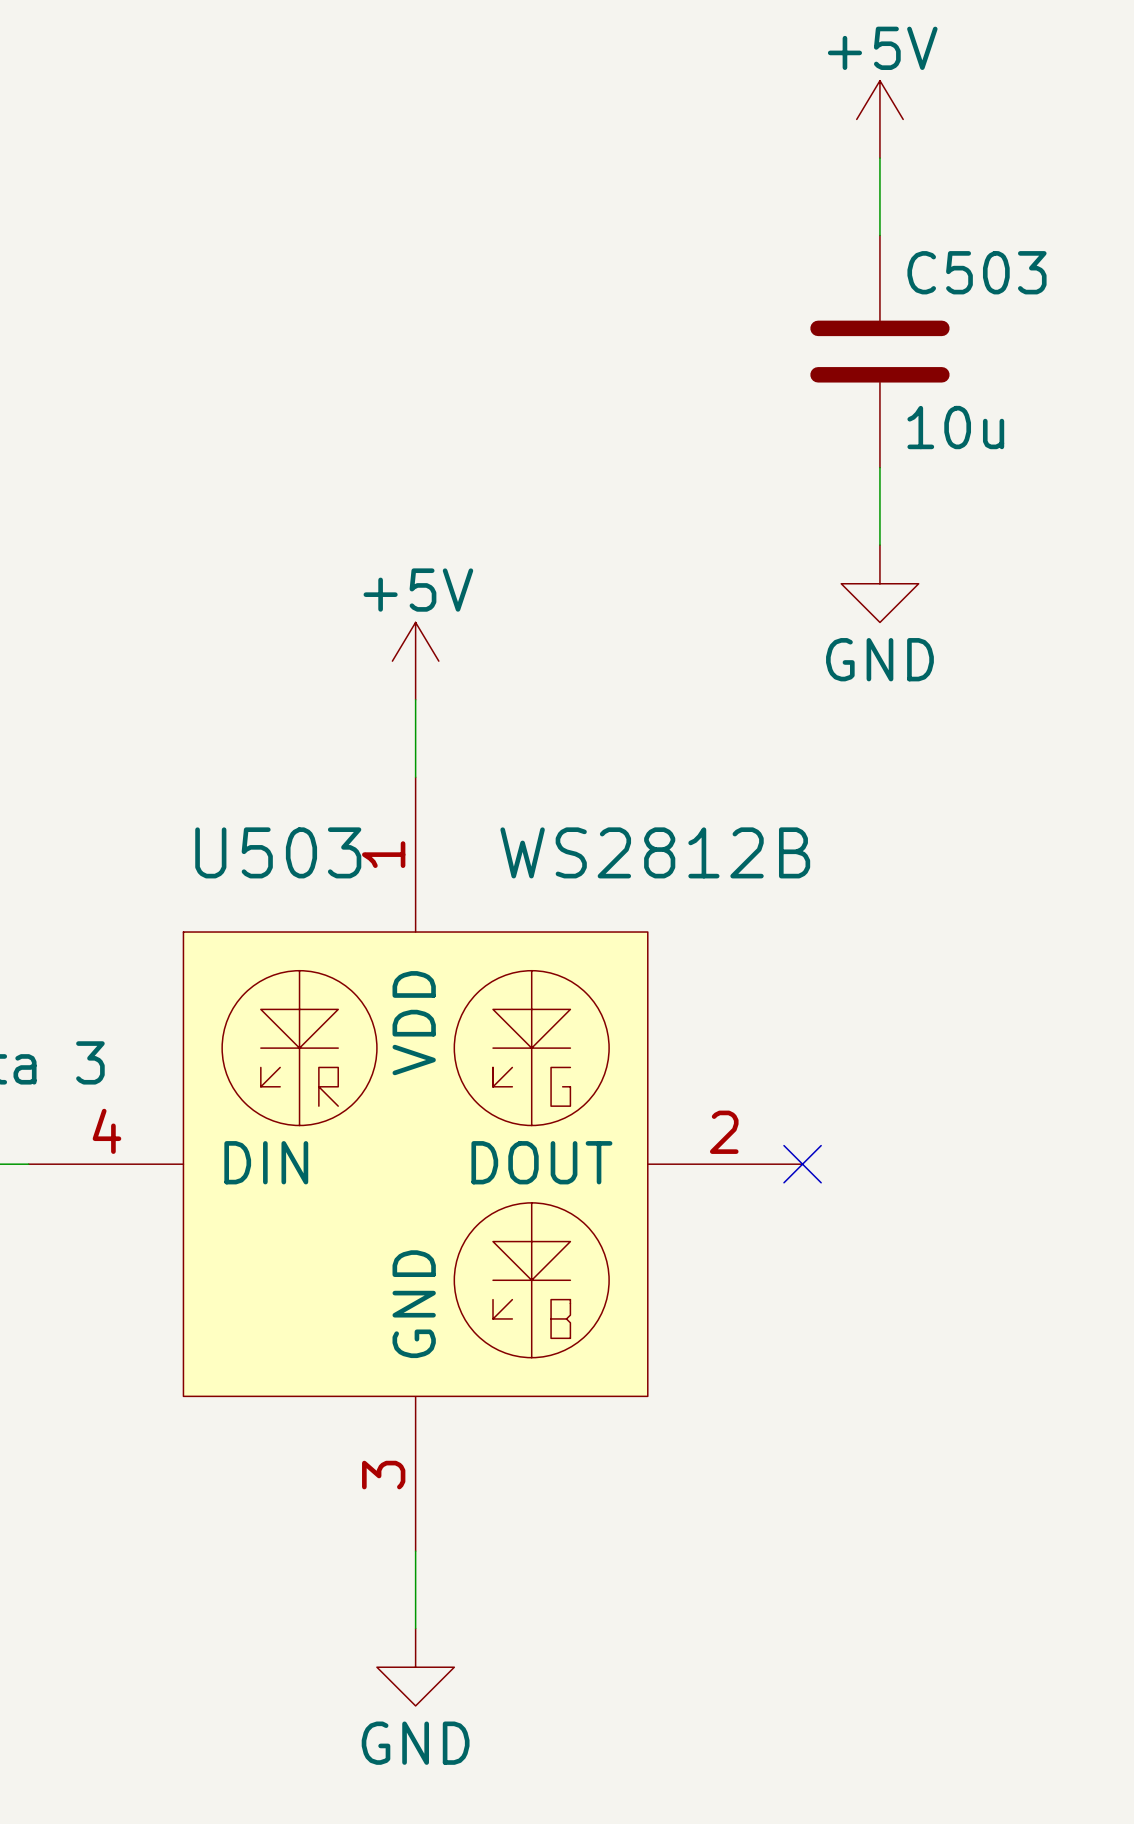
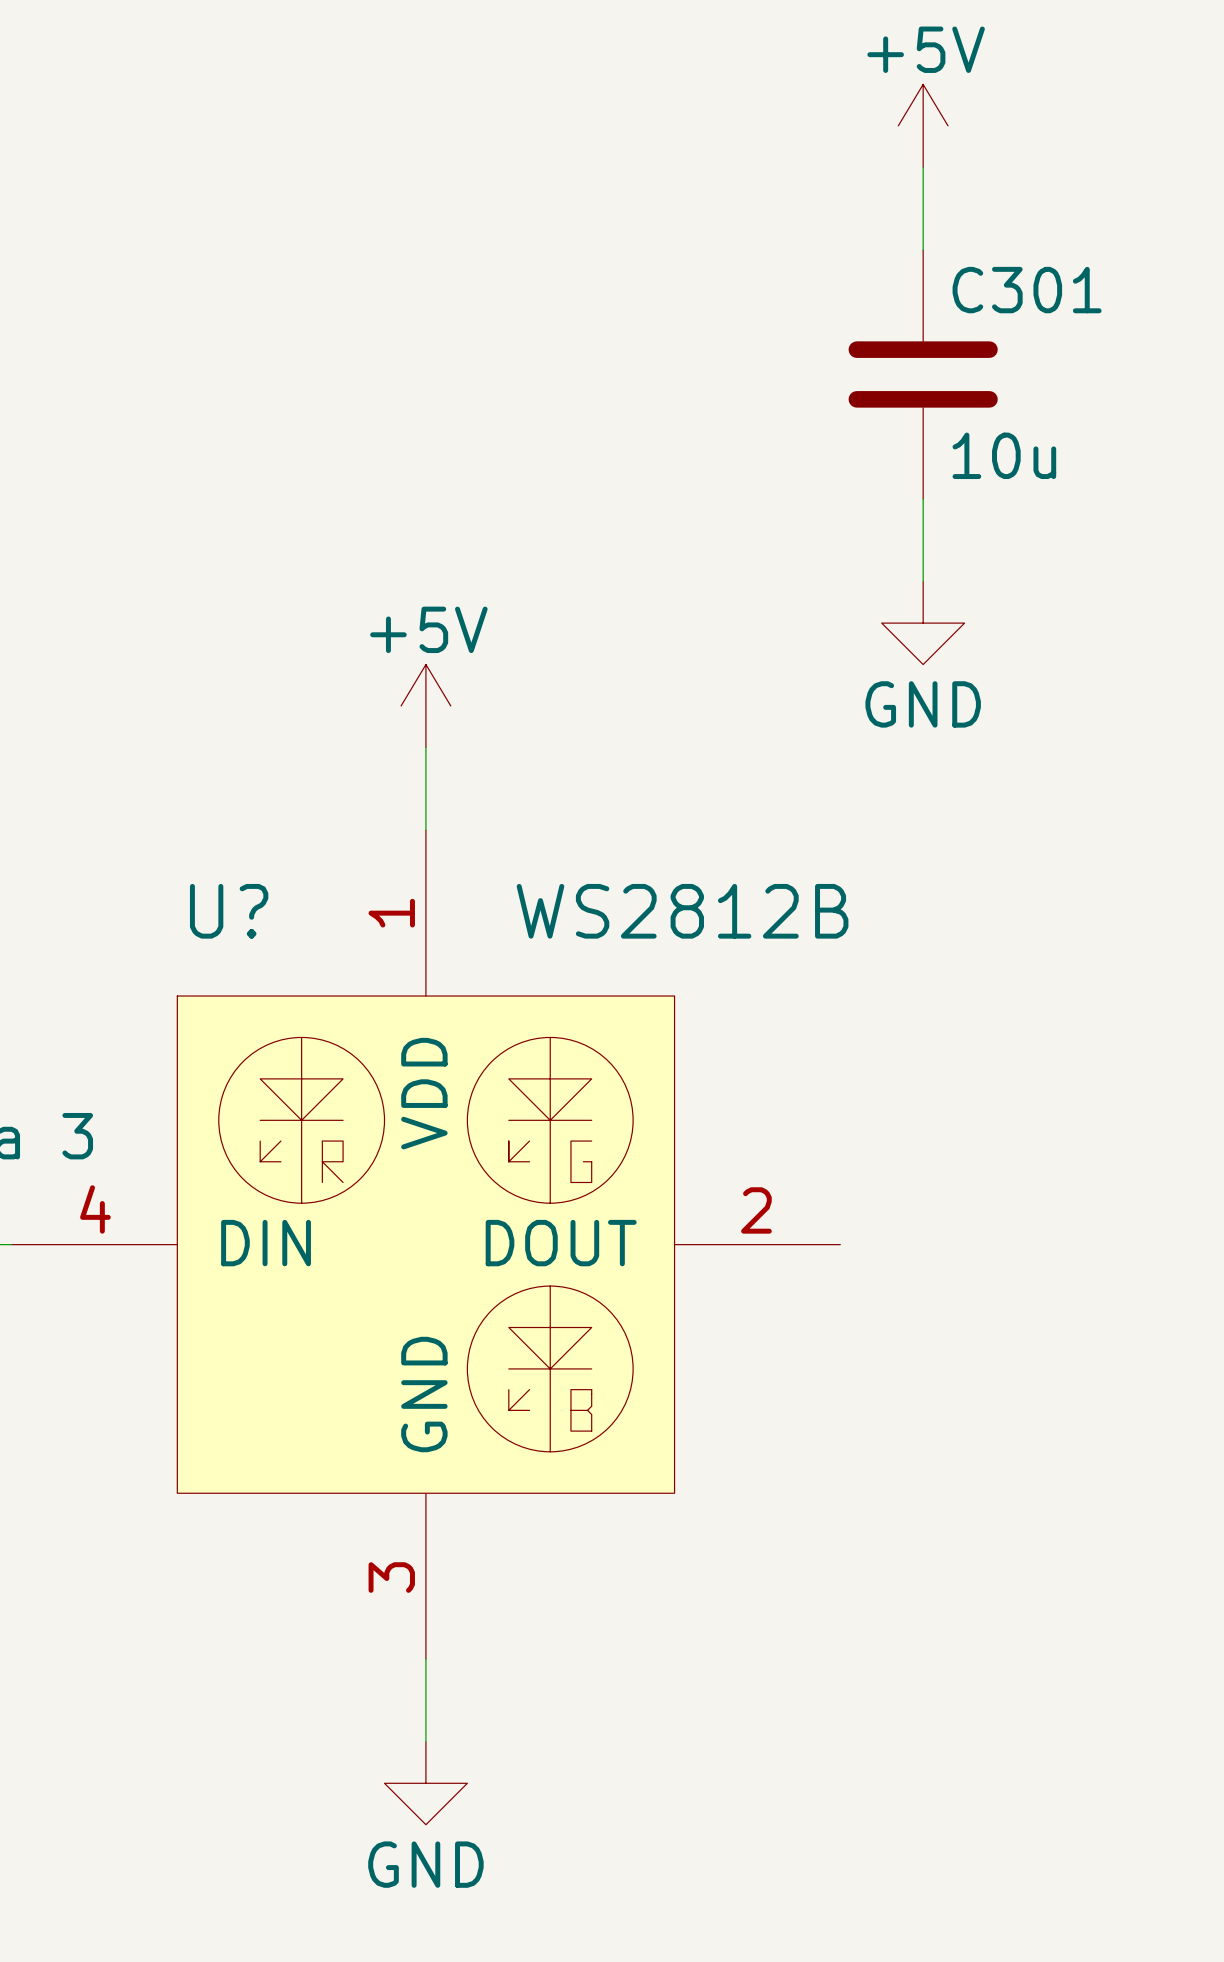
C503 name: C503 (976, 272) -> C301 (1027, 290)
U503 name: U503 (278, 852) -> U? (229, 911)
no-connect mark: (802, 1164) -> none

